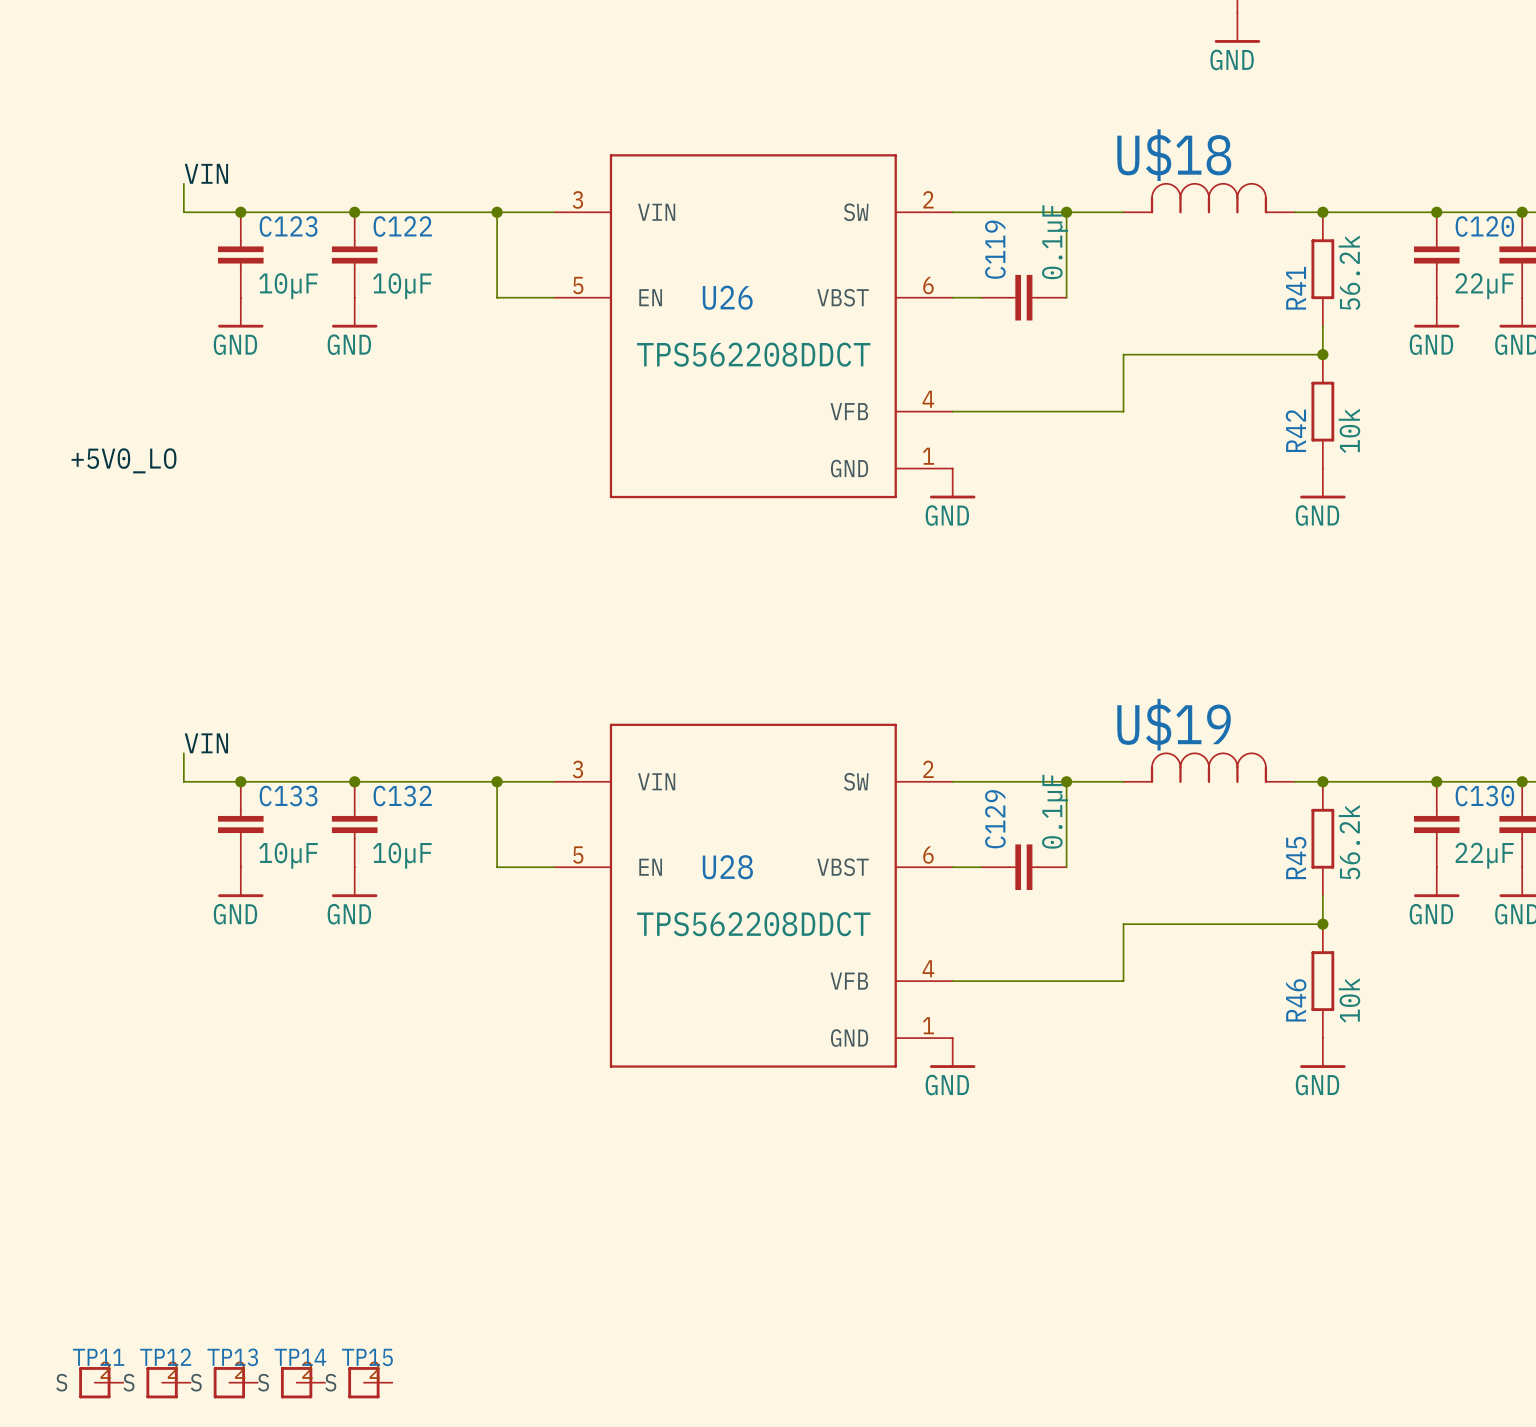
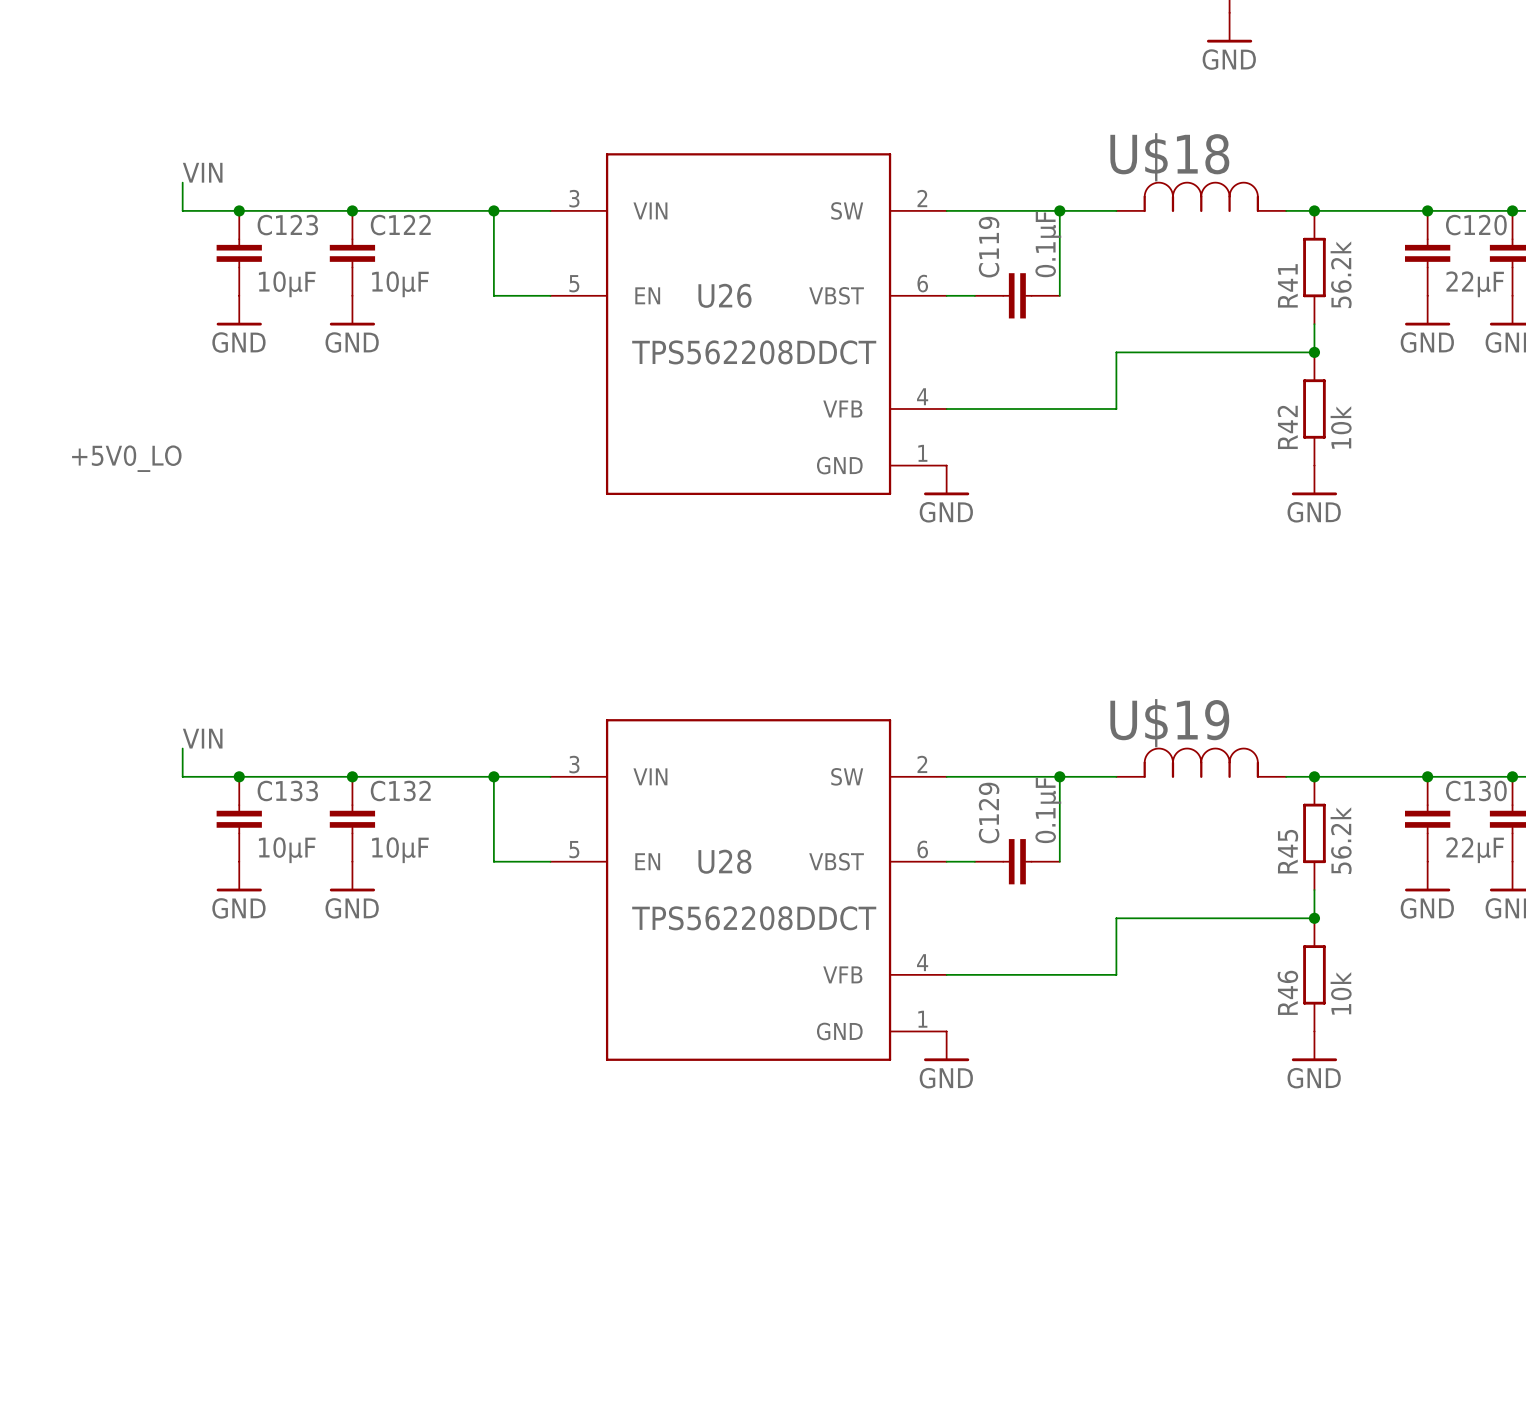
TP11: (101, 1382) -> none
TP12: (168, 1382) -> none
TP13: (235, 1382) -> none
TP14: (303, 1382) -> none
TP15: (370, 1382) -> none

